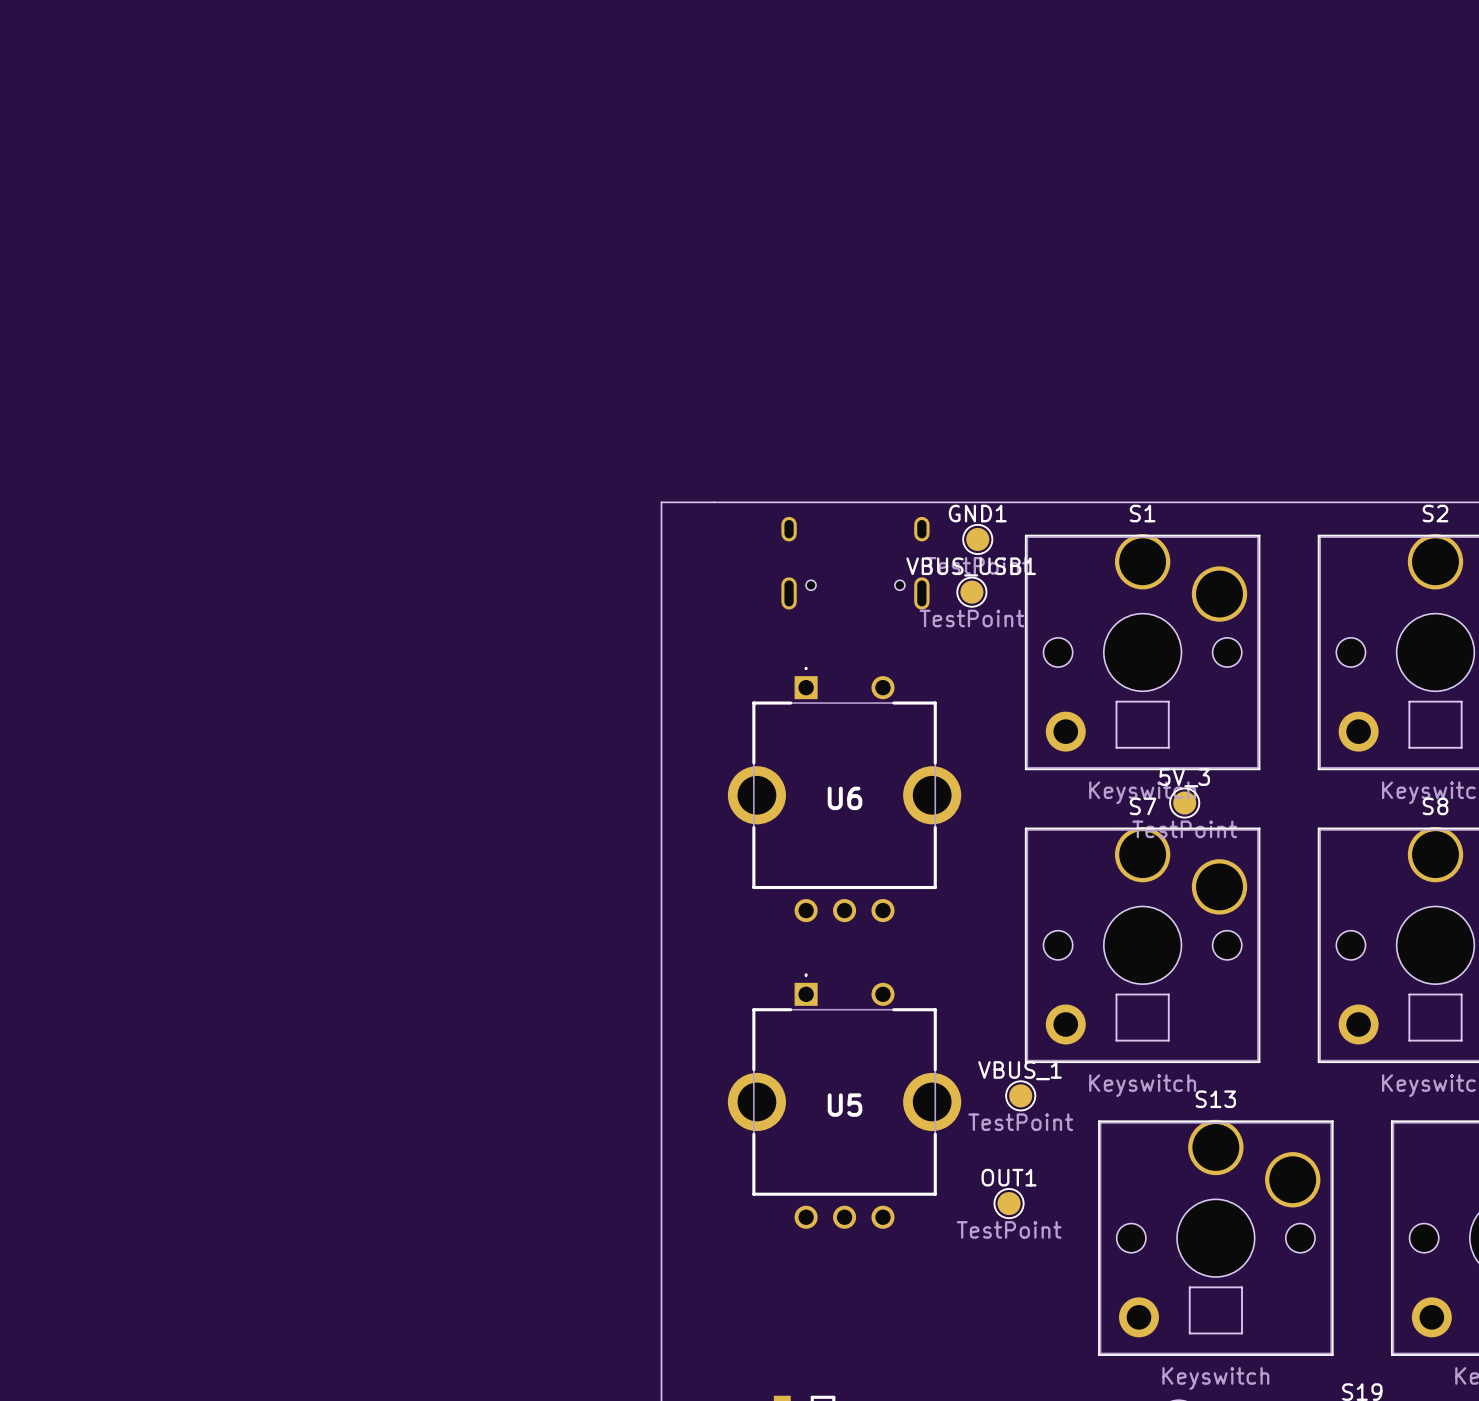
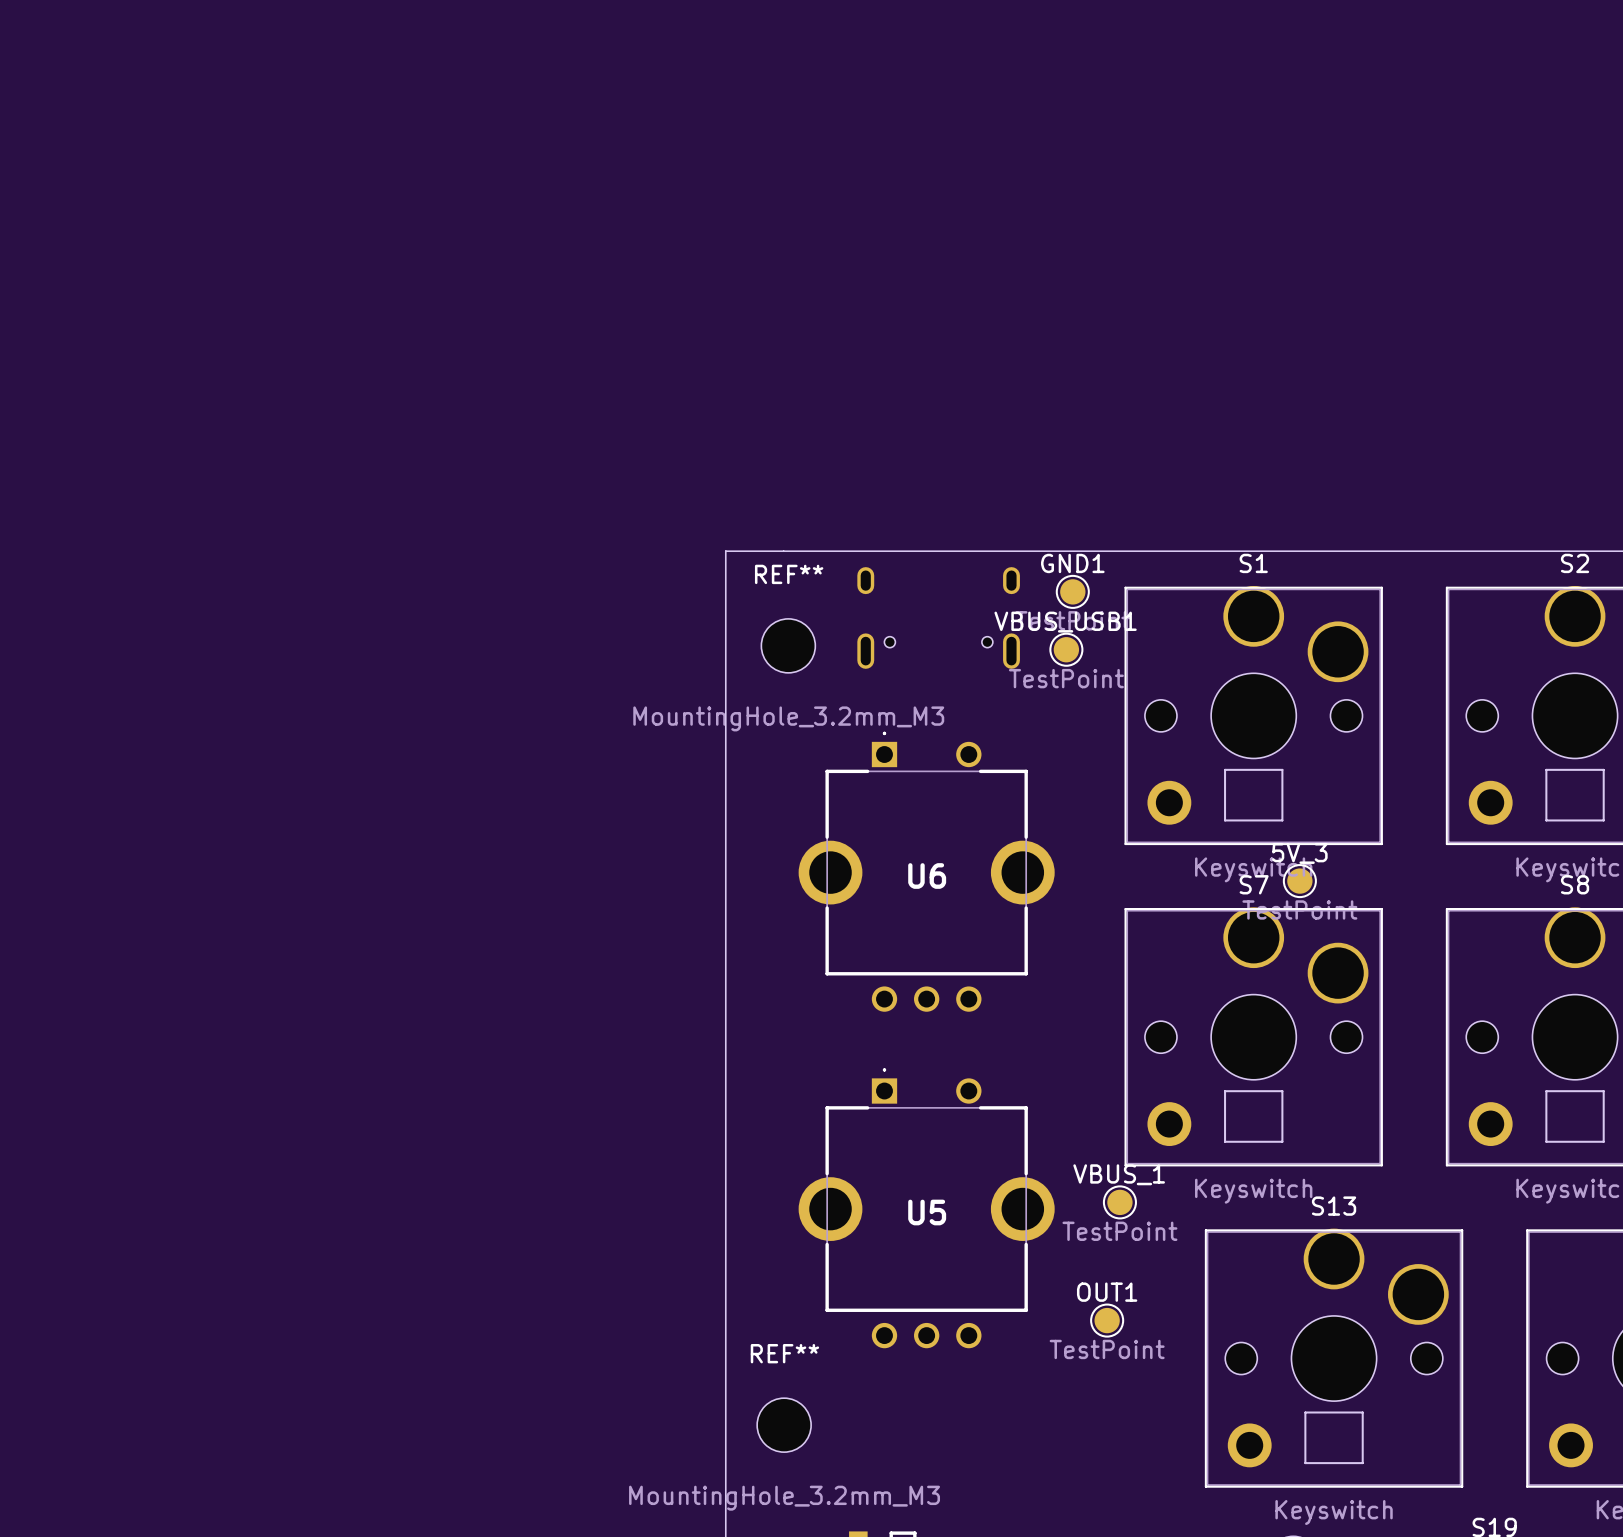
REF**: none -> MountingHole_3.2mm_M3 (788, 645)
REF**: none -> MountingHole_3.2mm_M3 (784, 1425)

